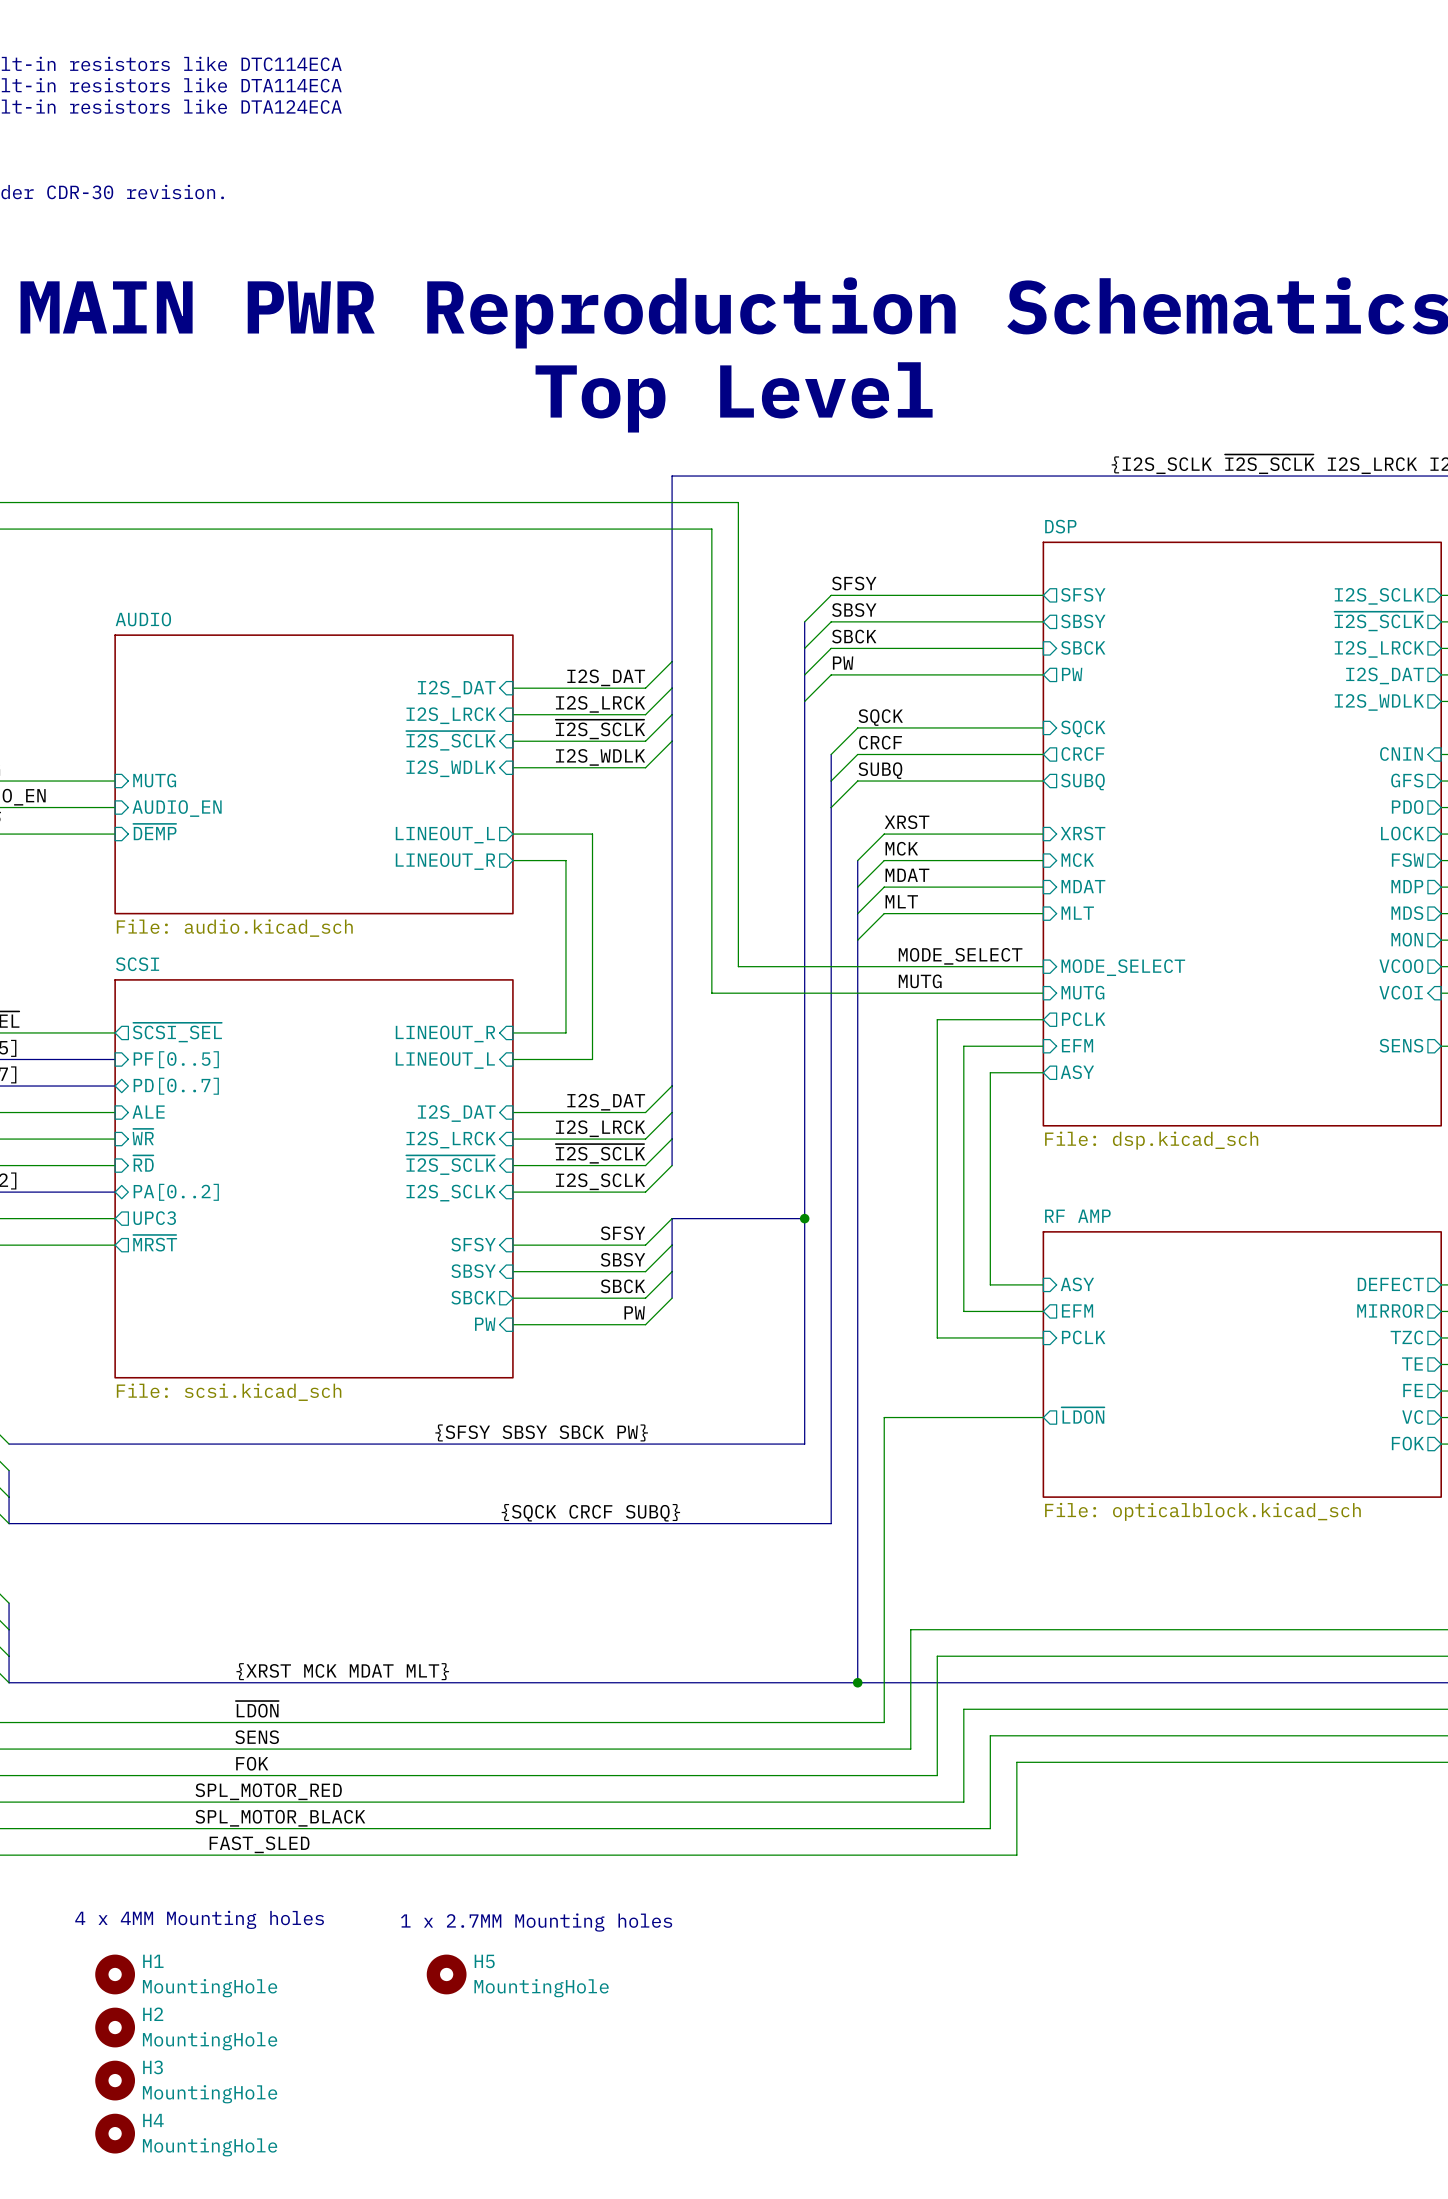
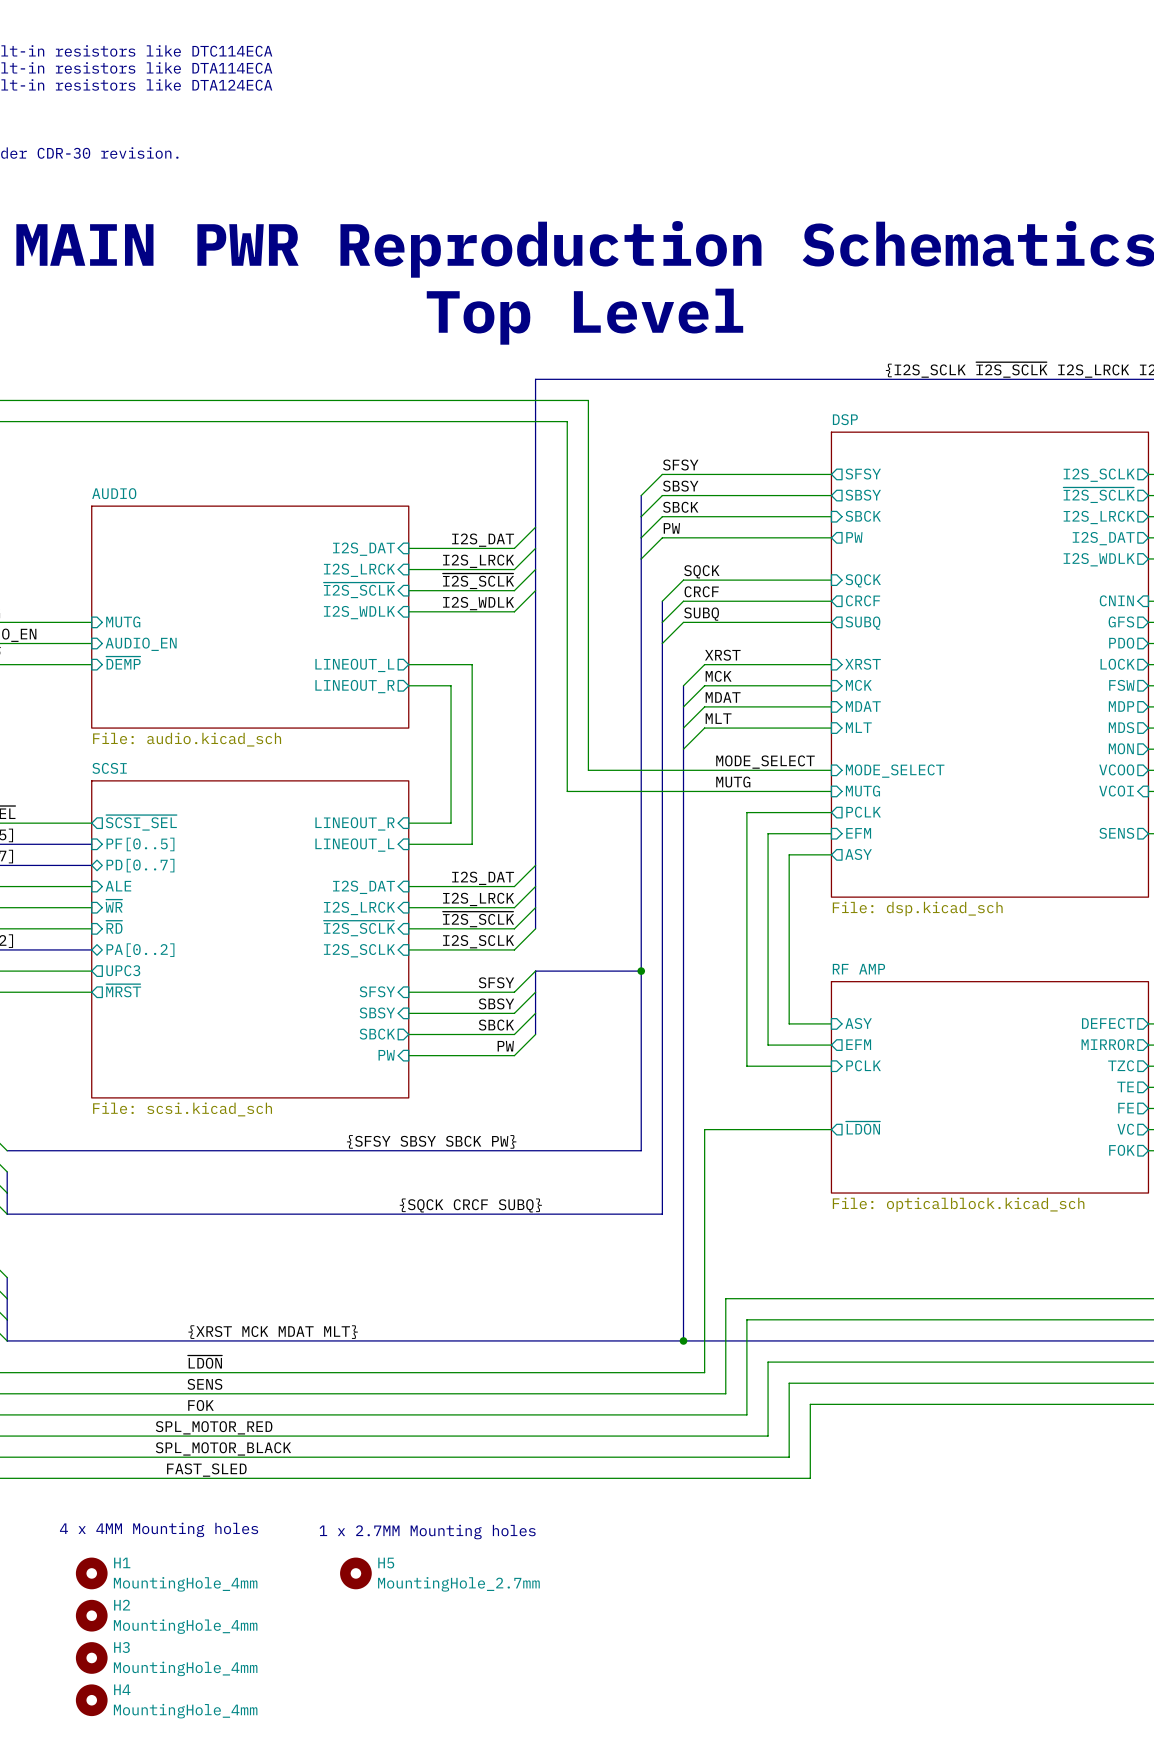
H1 value: MountingHole (210, 1988) -> MountingHole_4mm (185, 1584)
H5 value: MountingHole (541, 1988) -> MountingHole_2.7mm (458, 1584)
H2 value: MountingHole (210, 2041) -> MountingHole_4mm (185, 1626)
H3 value: MountingHole (210, 2094) -> MountingHole_4mm (185, 1668)
H4 value: MountingHole (210, 2147) -> MountingHole_4mm (185, 1711)

